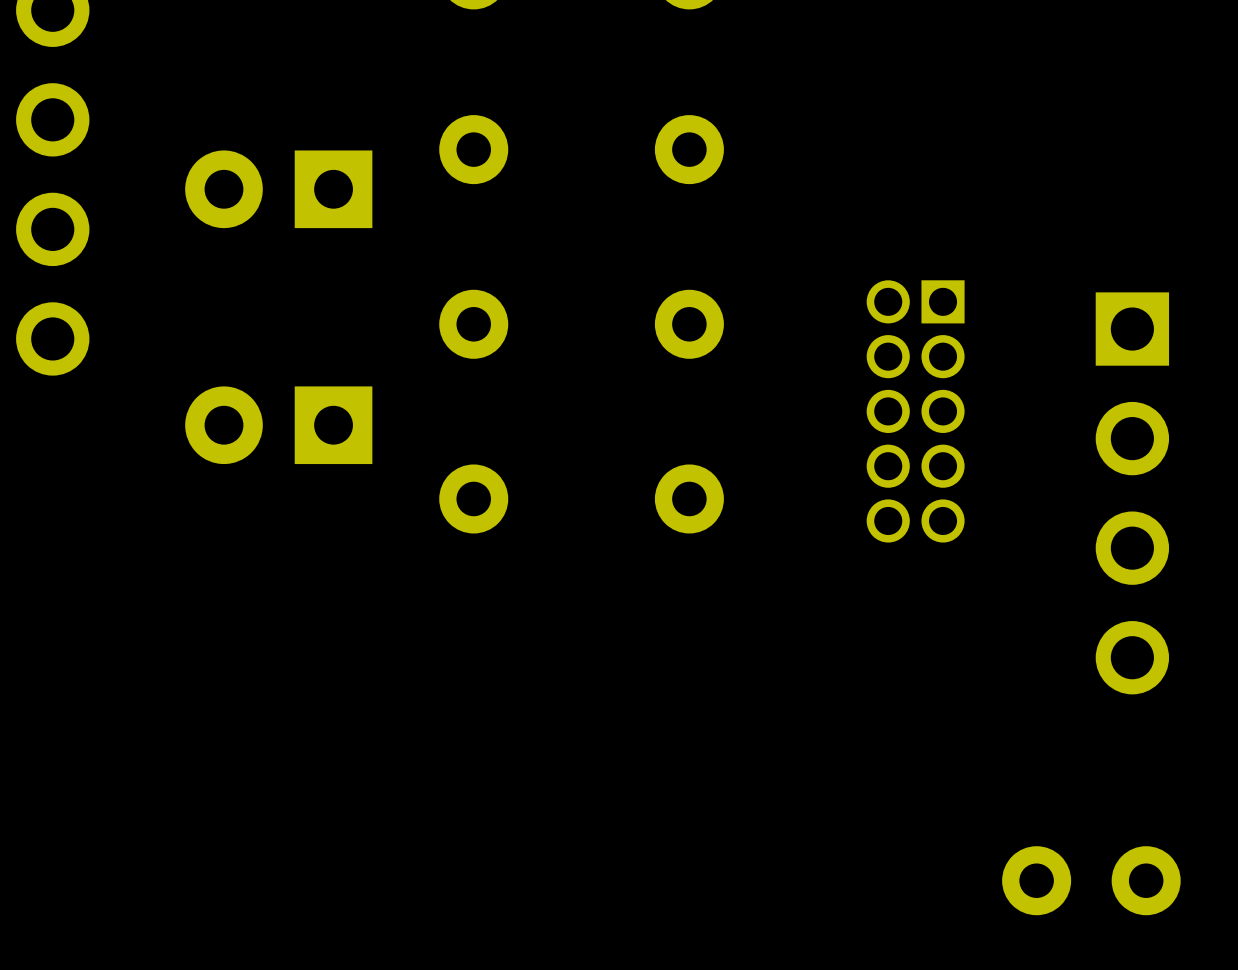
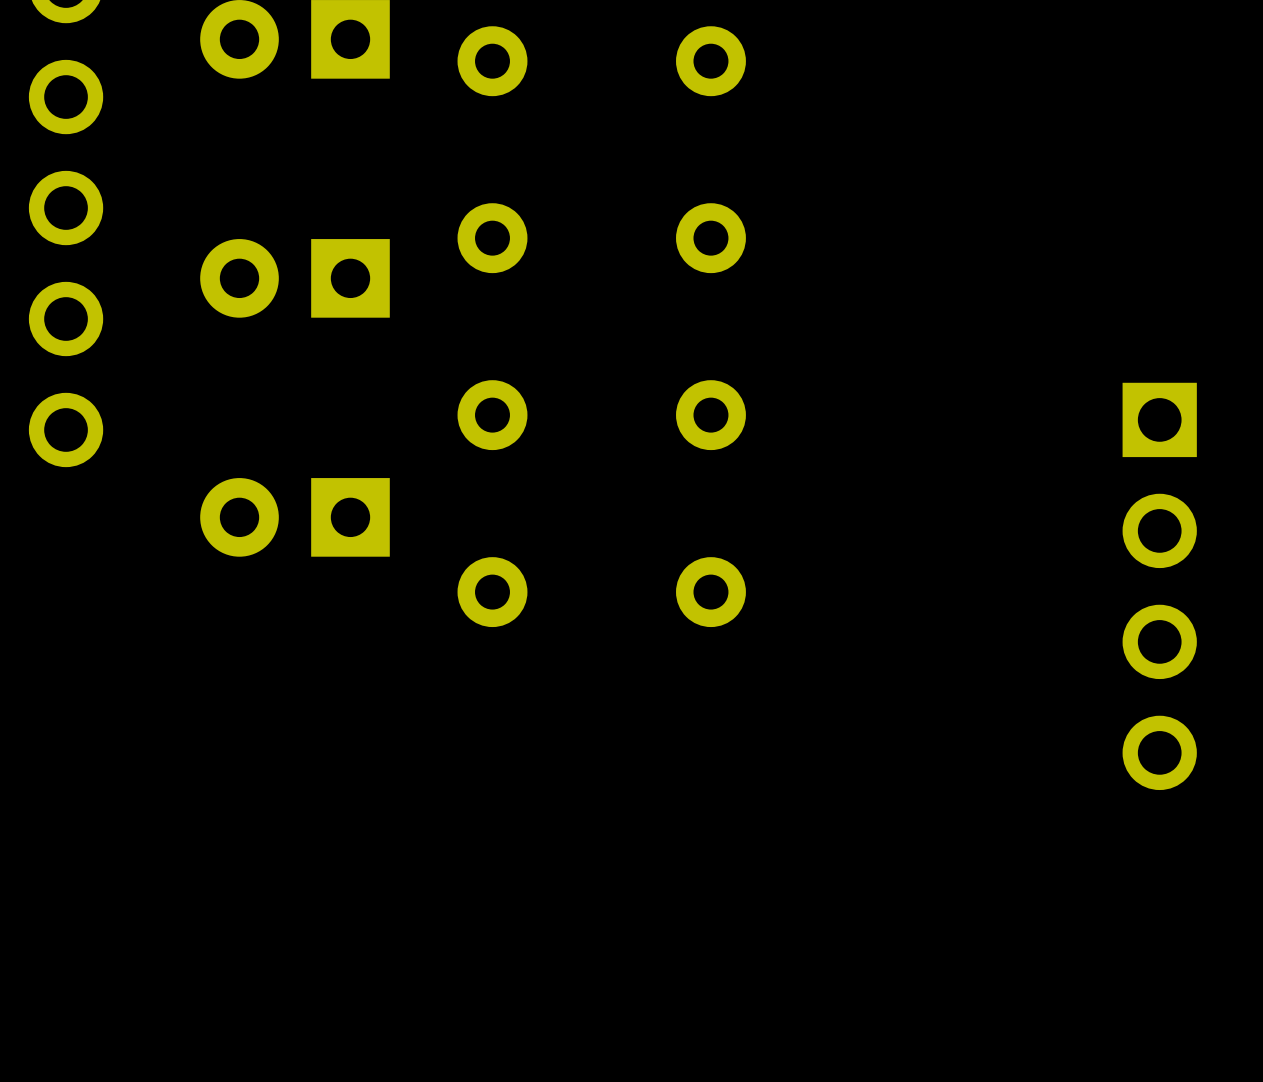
part: (915, 411) -> none
part: (1091, 880) -> none

